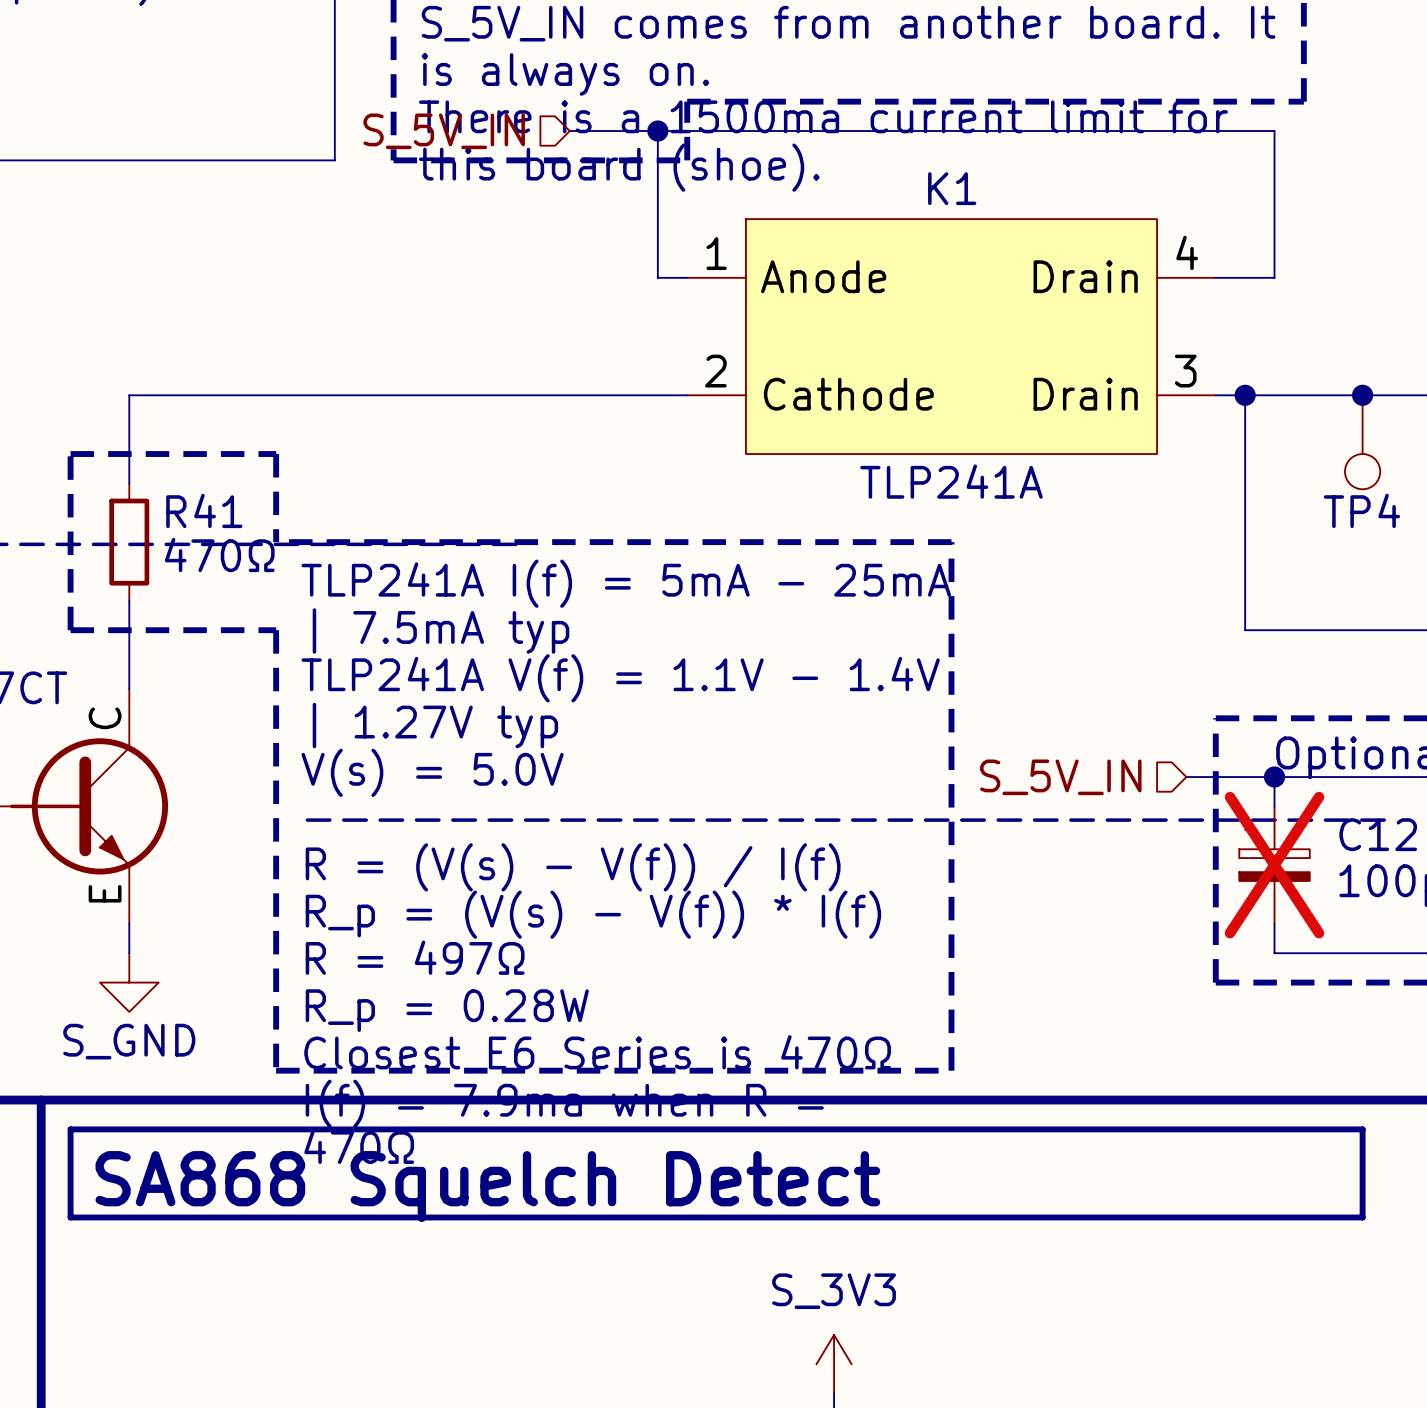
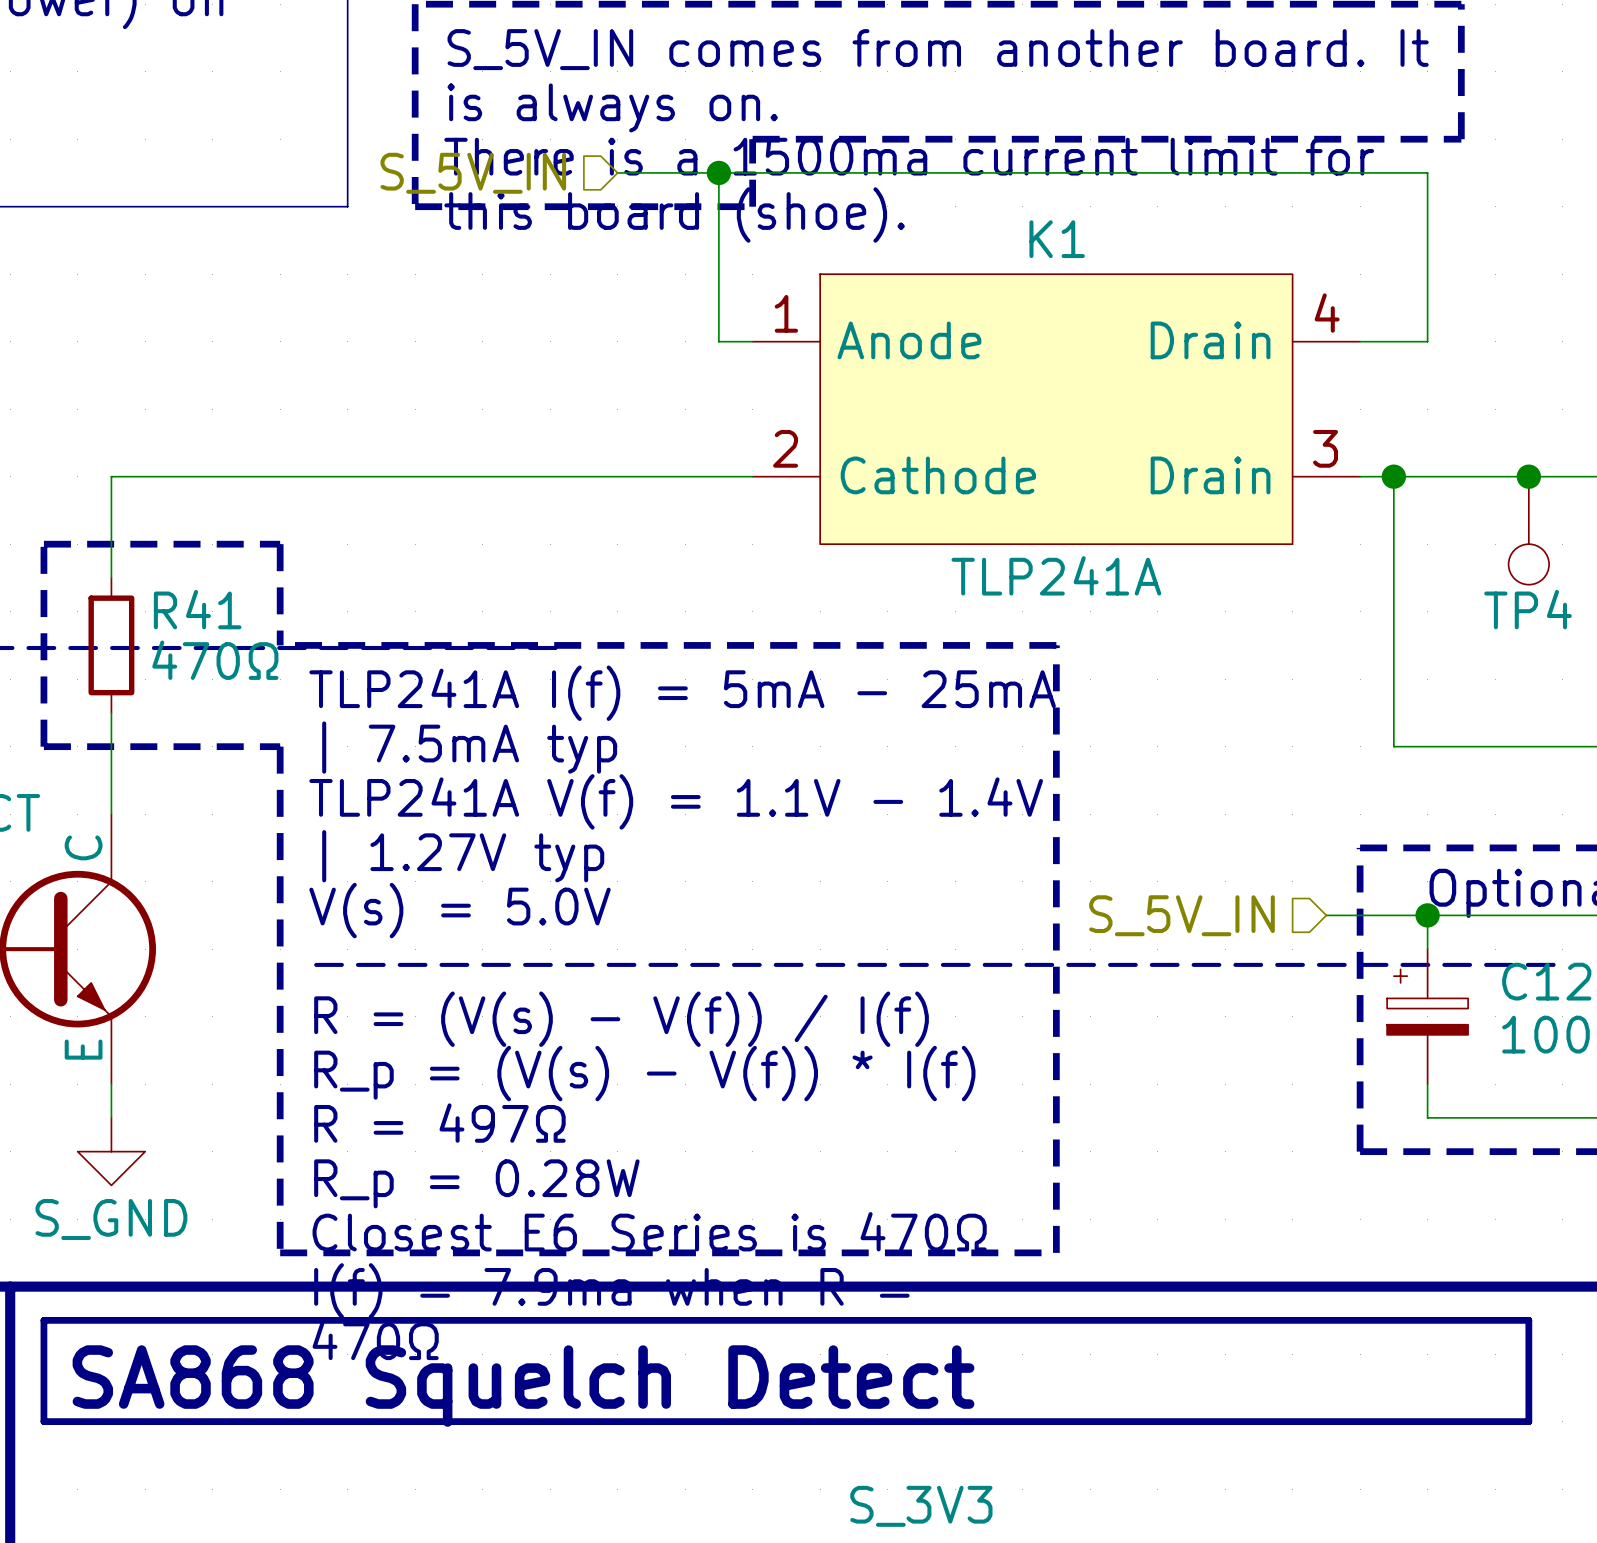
C12 do-not-place cross: (1274, 865) -> none

